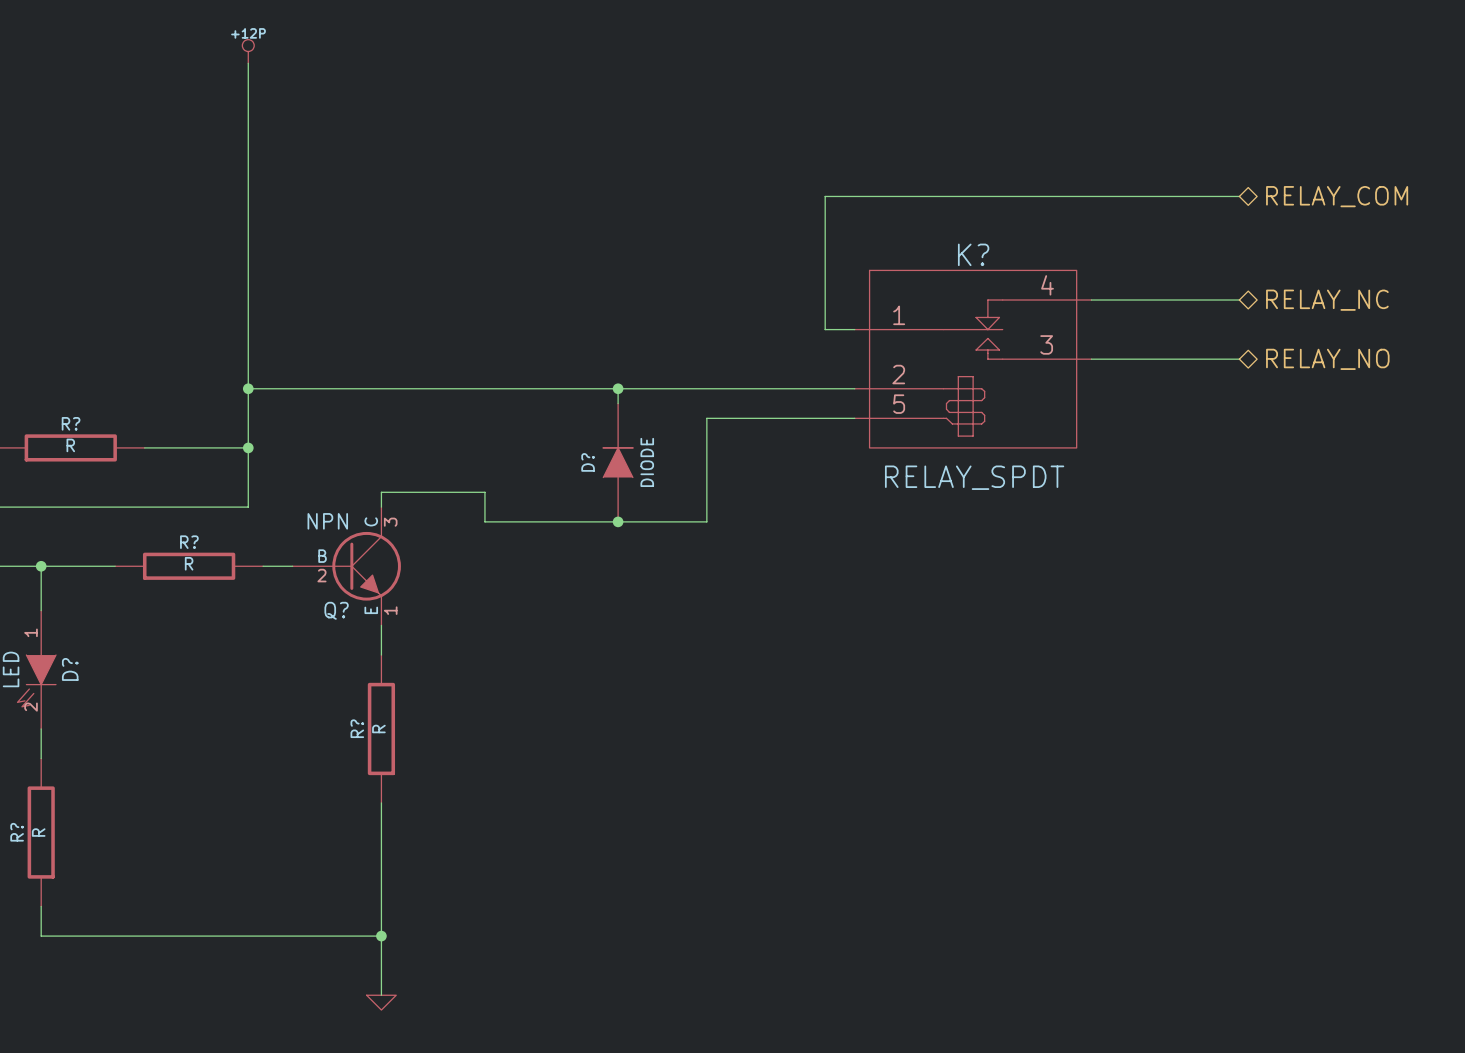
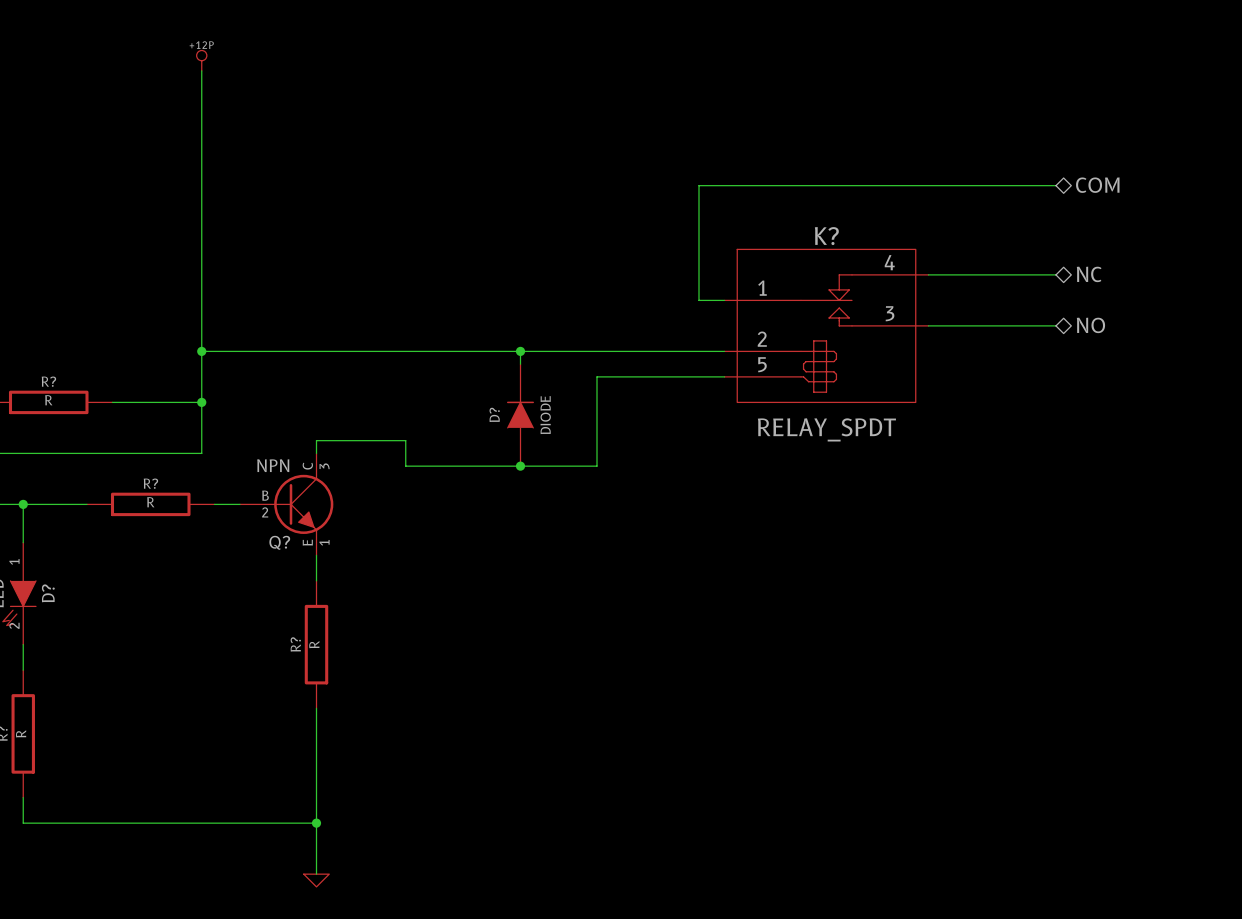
hierarchical label: RELAY_COM (1337, 196) -> COM (1097, 185)
hierarchical label: RELAY_NC (1327, 300) -> NC (1089, 274)
hierarchical label: RELAY_NO (1327, 359) -> NO (1090, 325)

